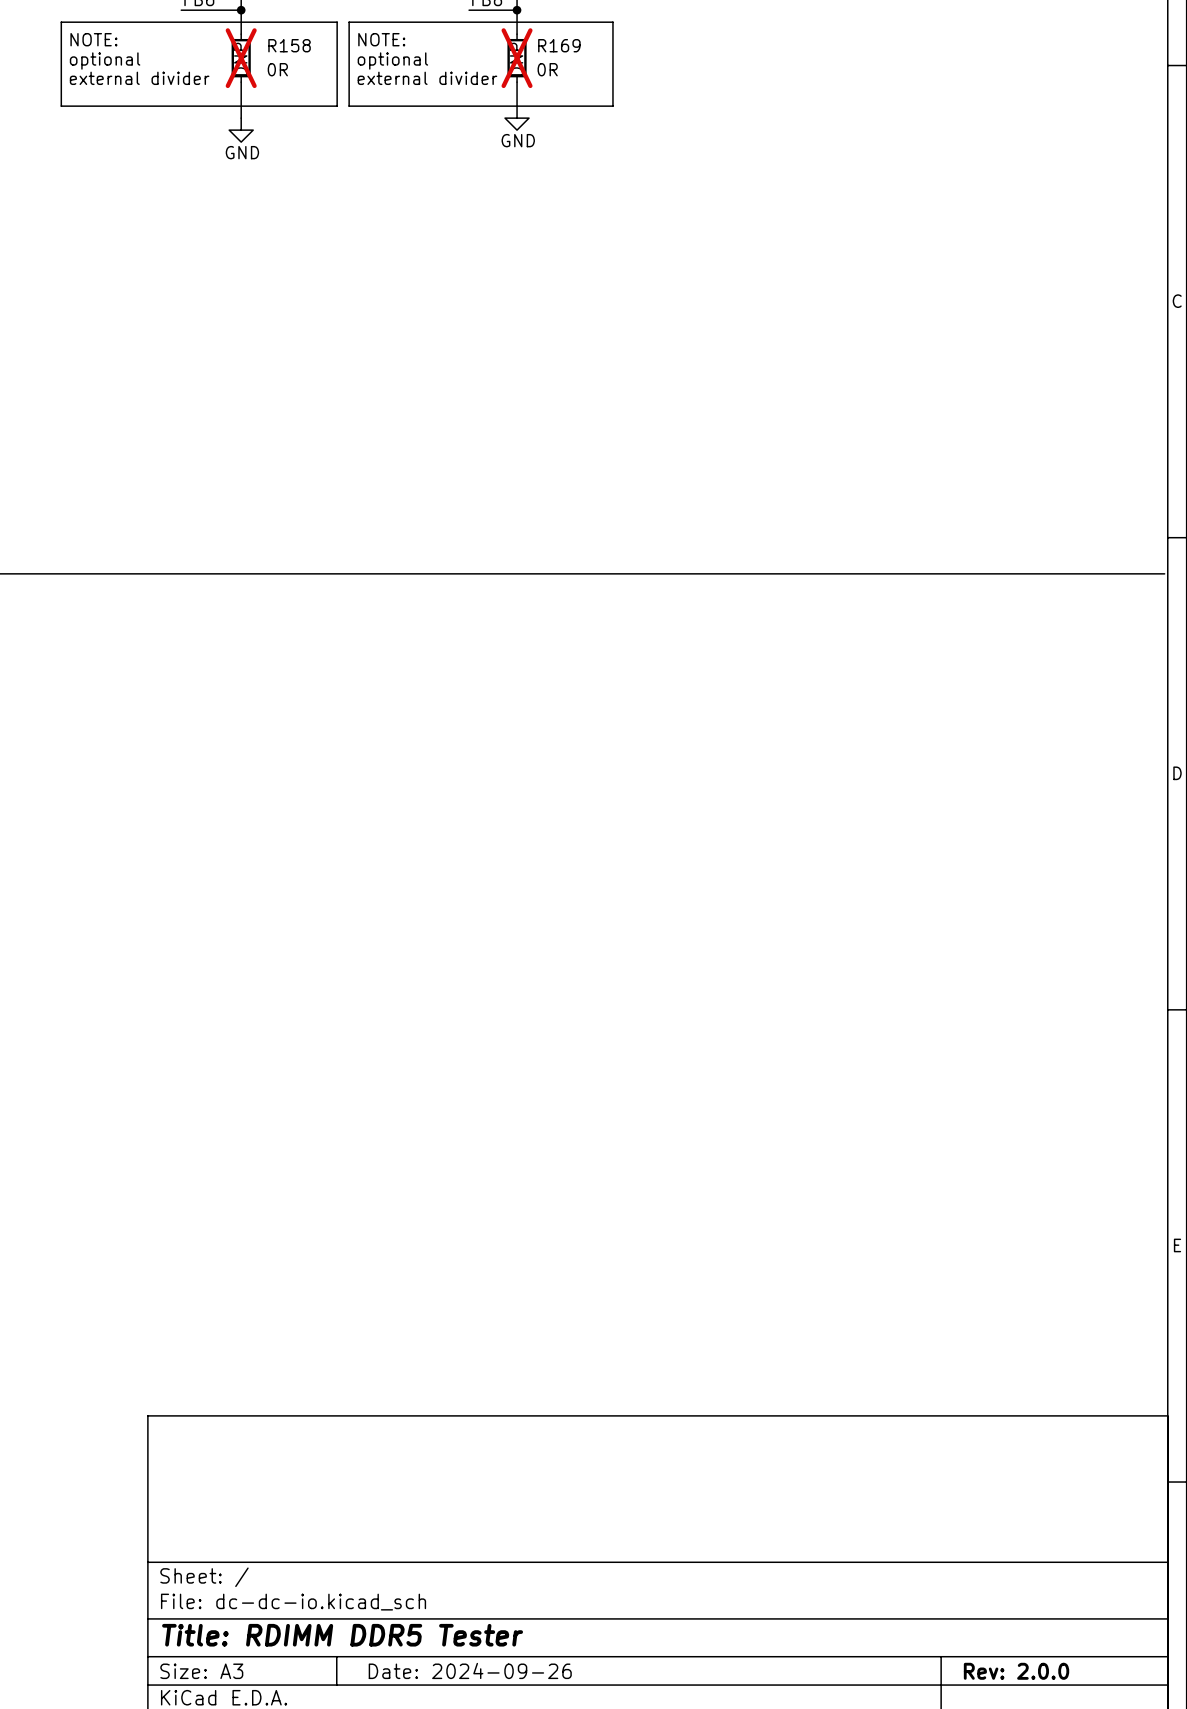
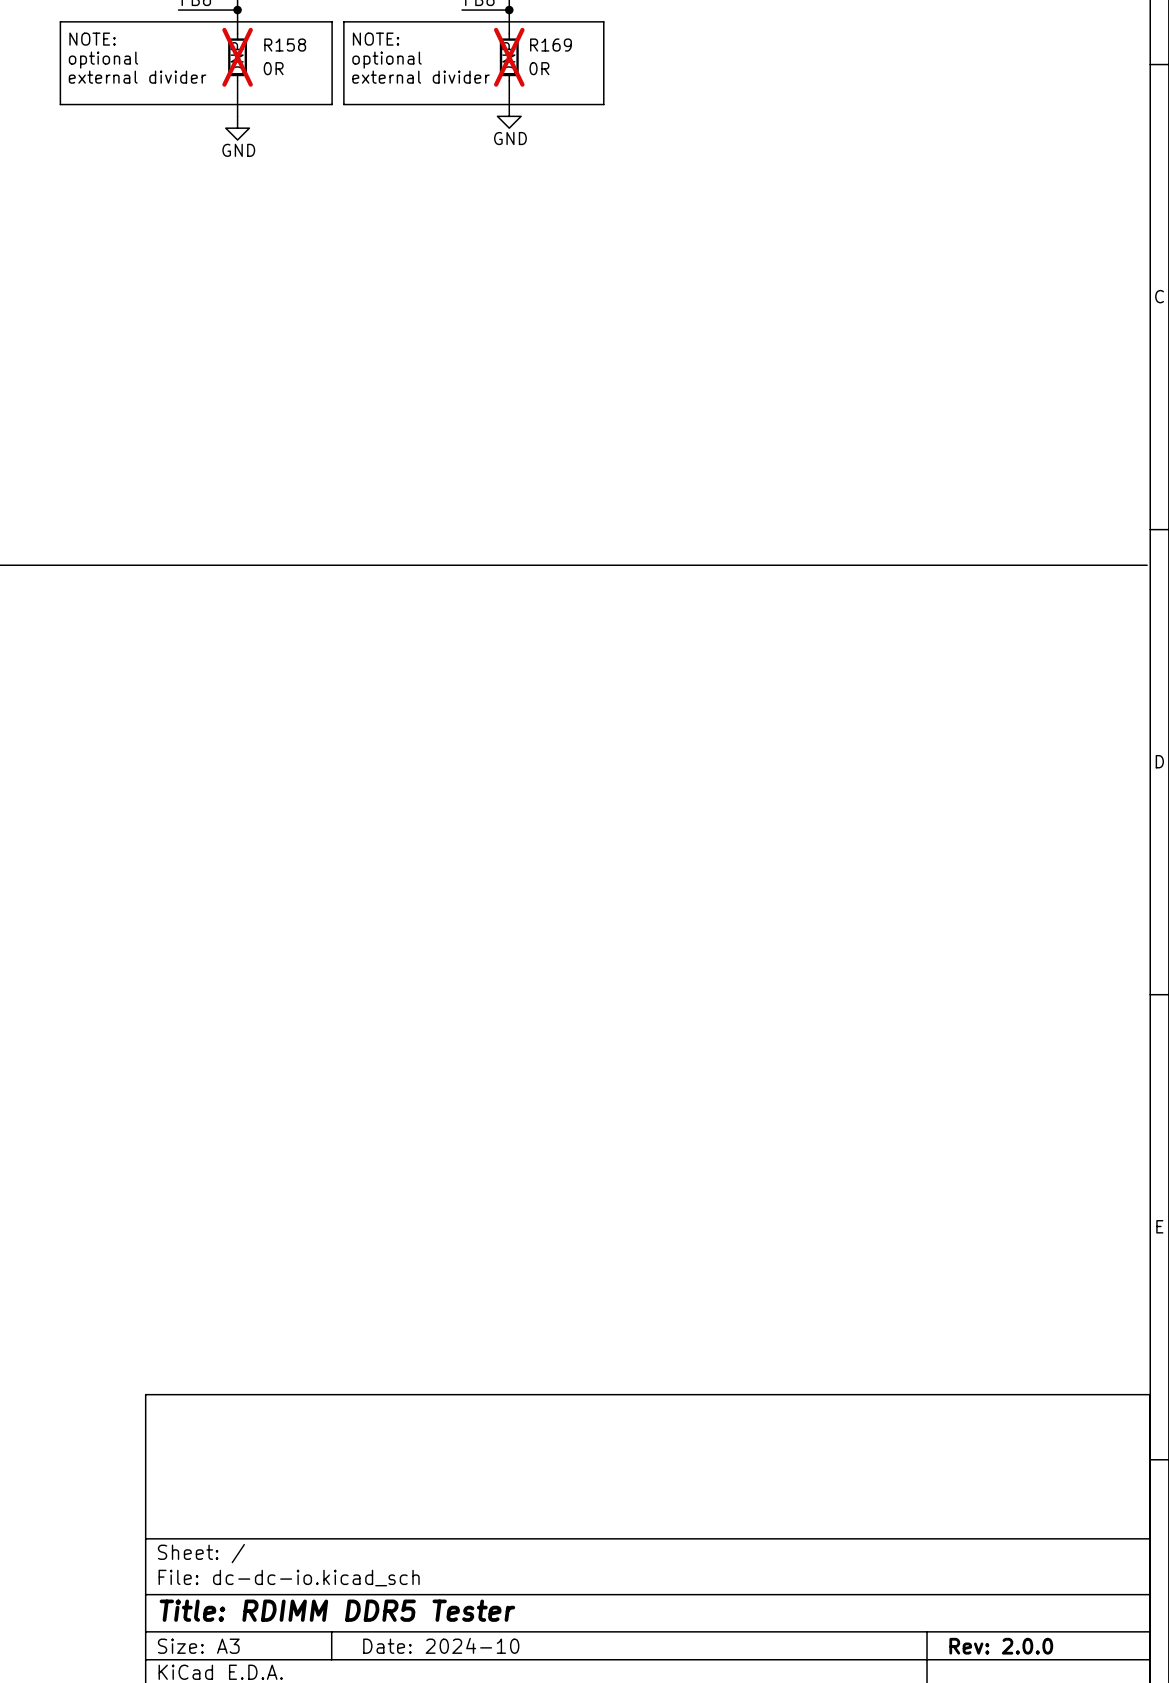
title block: Date: 2024-09-26 (470, 1670) -> Date: 2024-10 (441, 1645)

